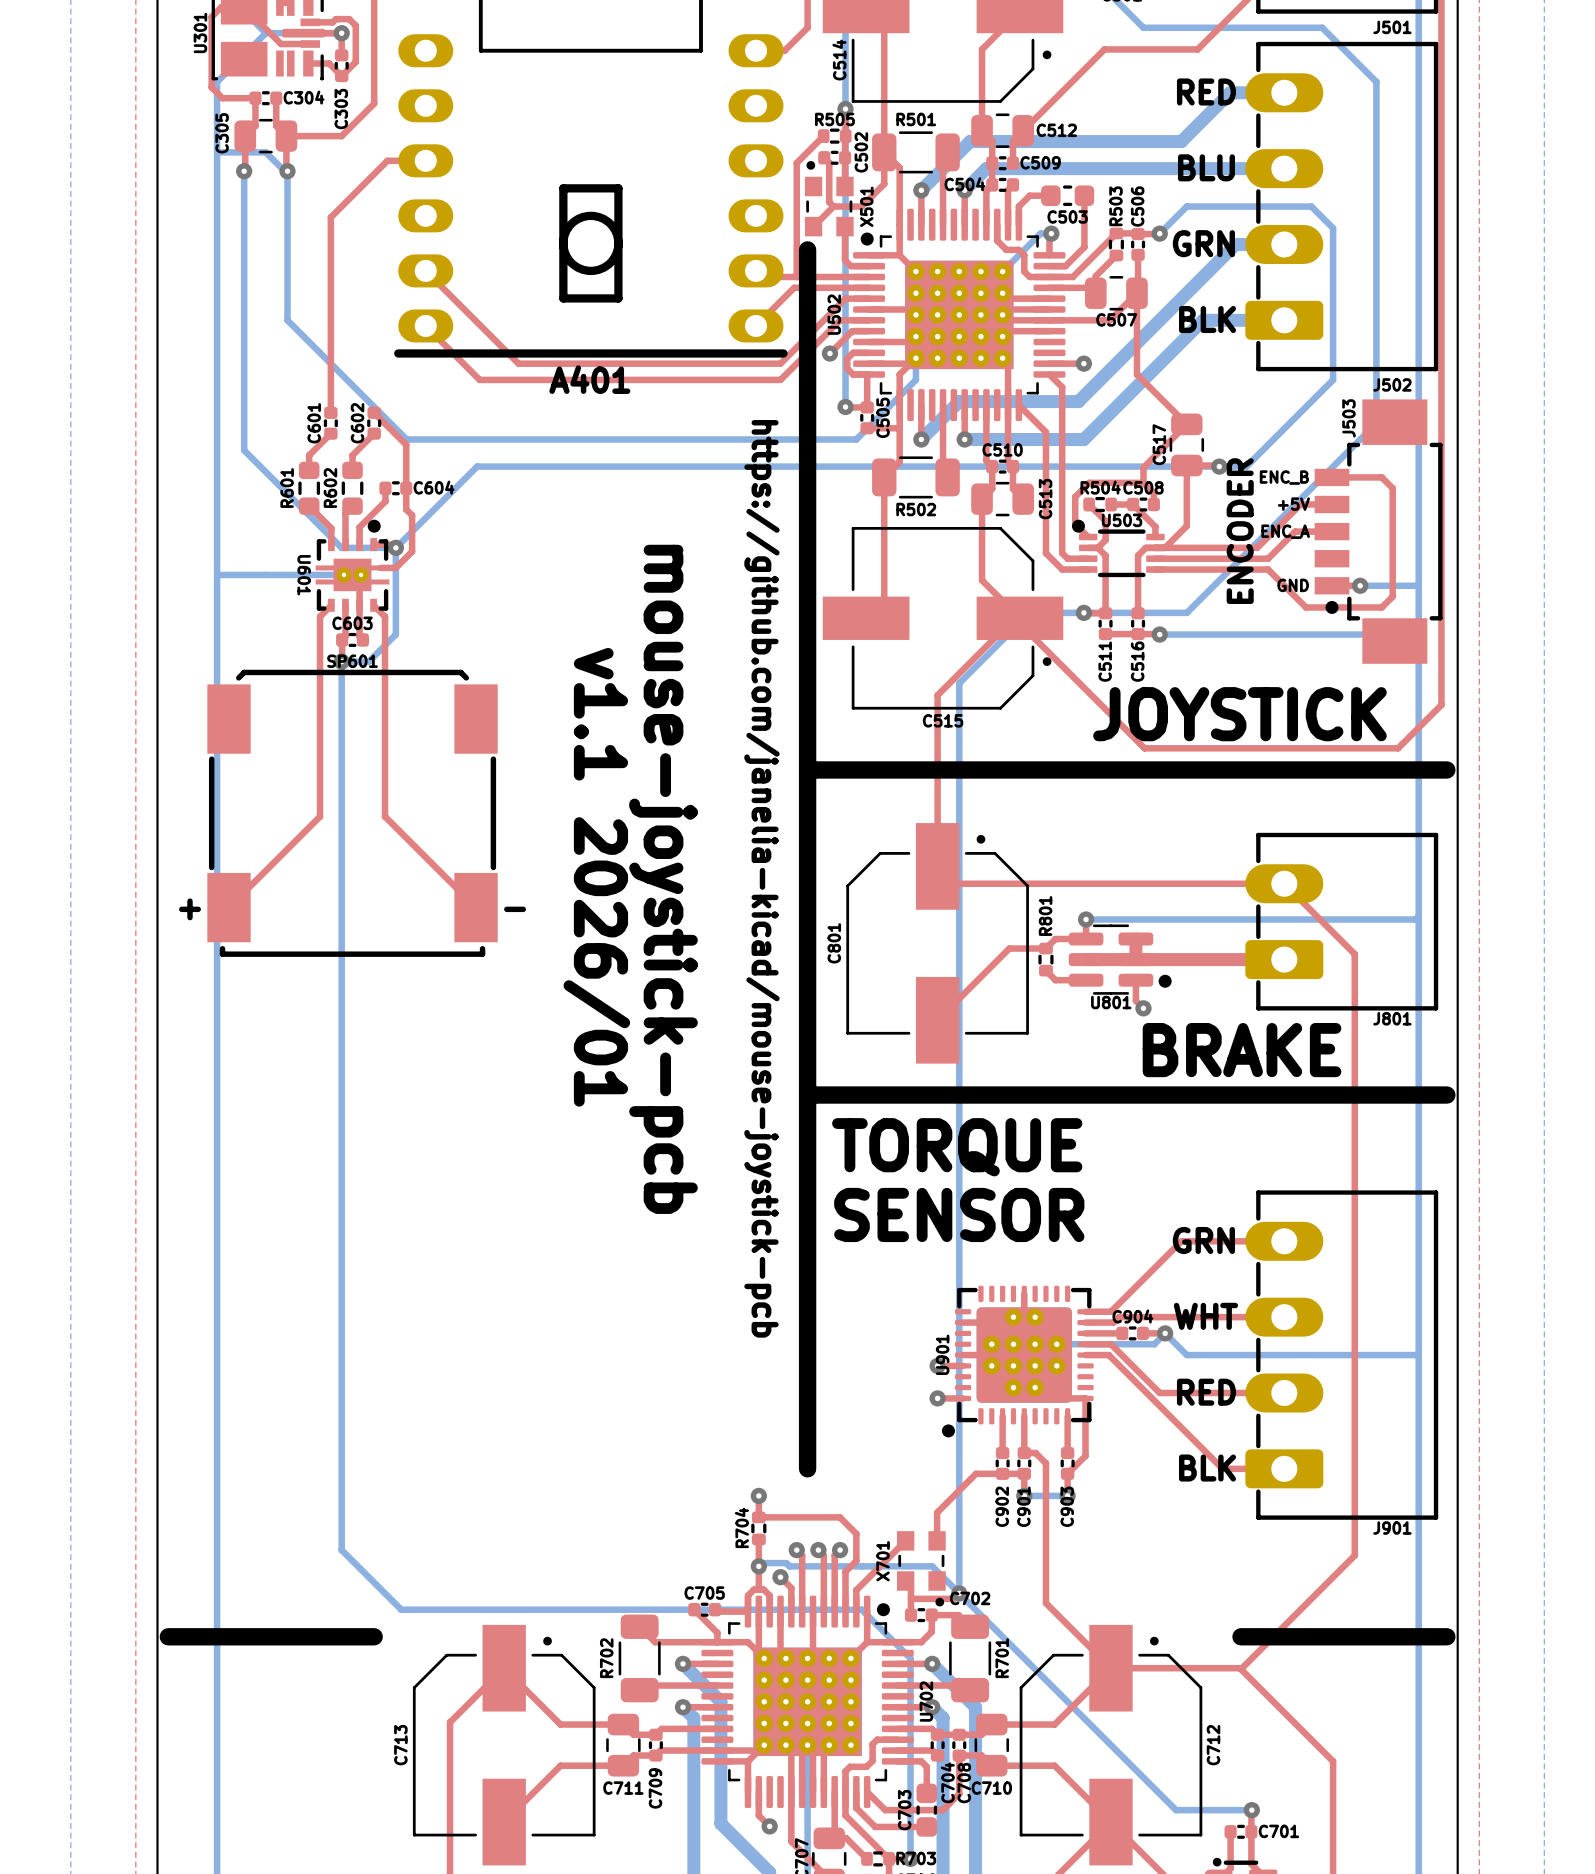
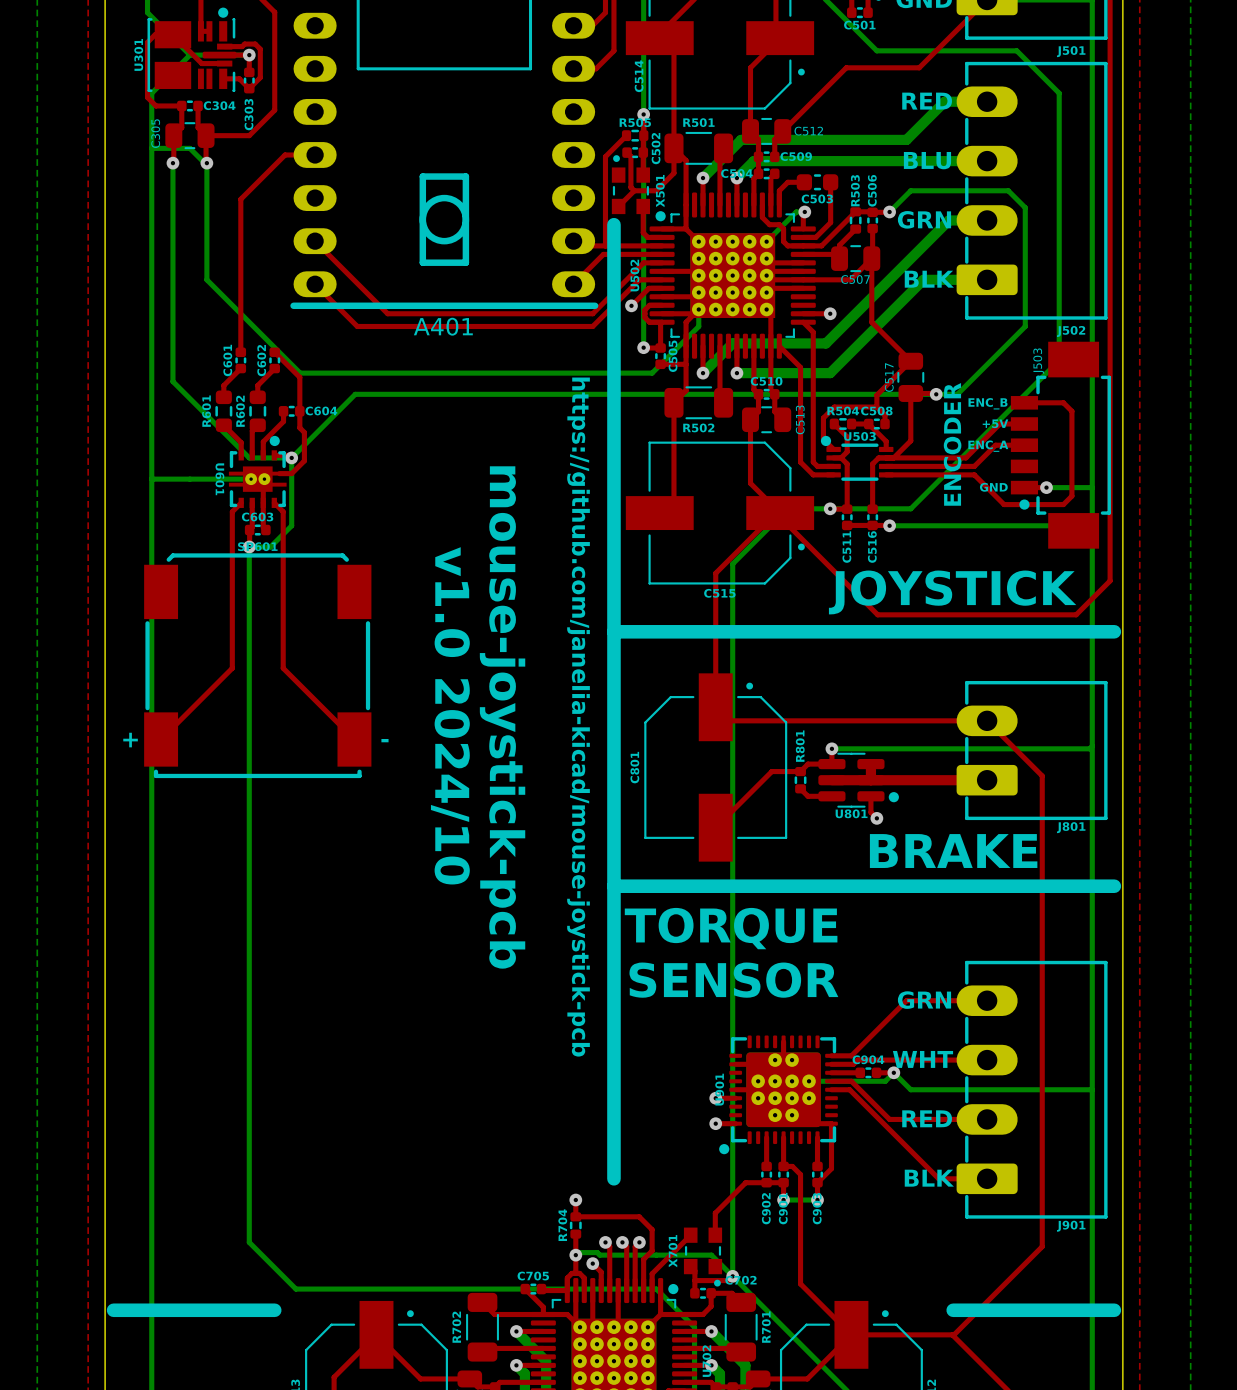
text: v1.1 2026/01 (596, 877) -> v1.0 2024/10 (450, 715)

